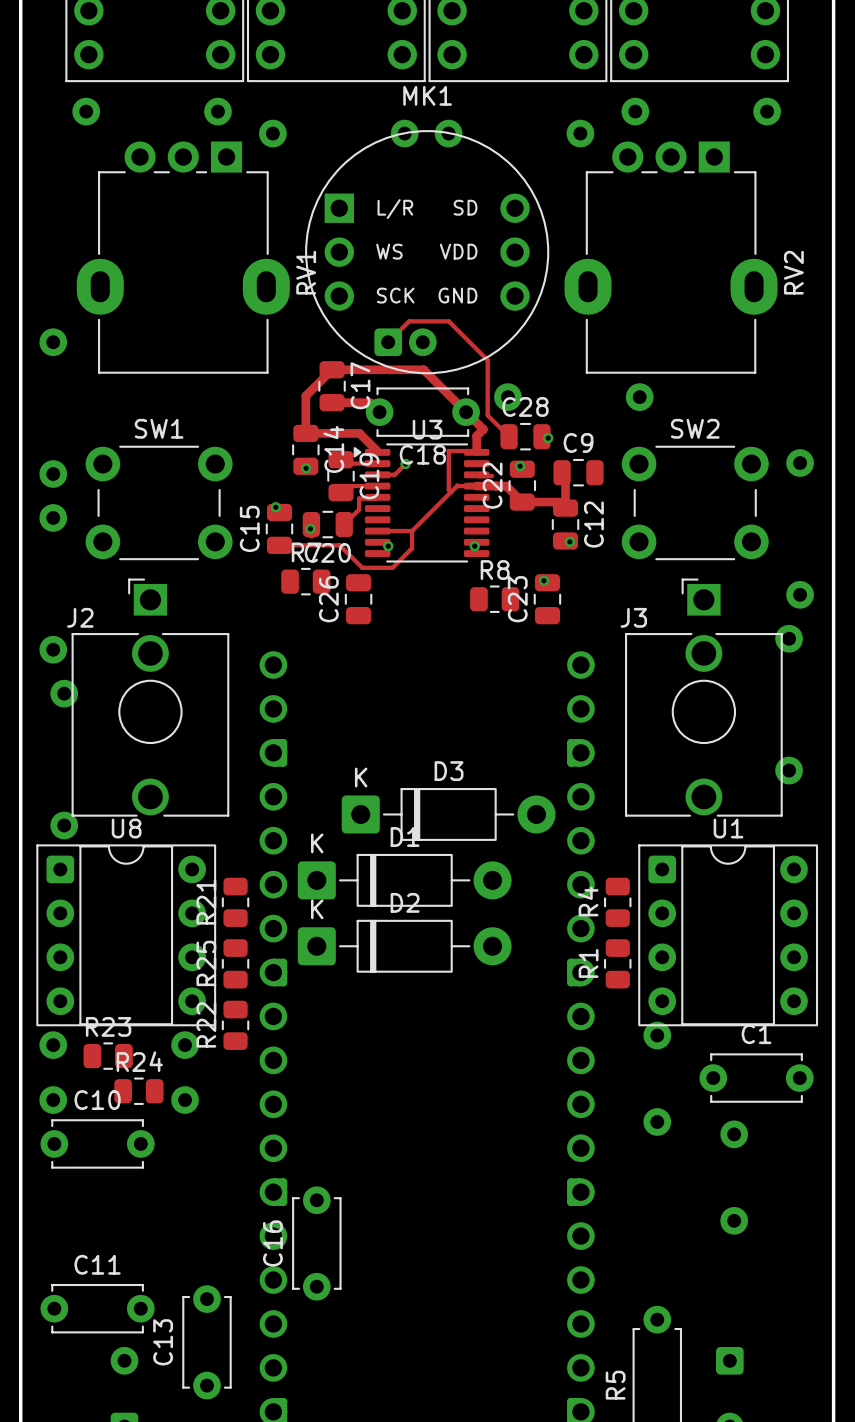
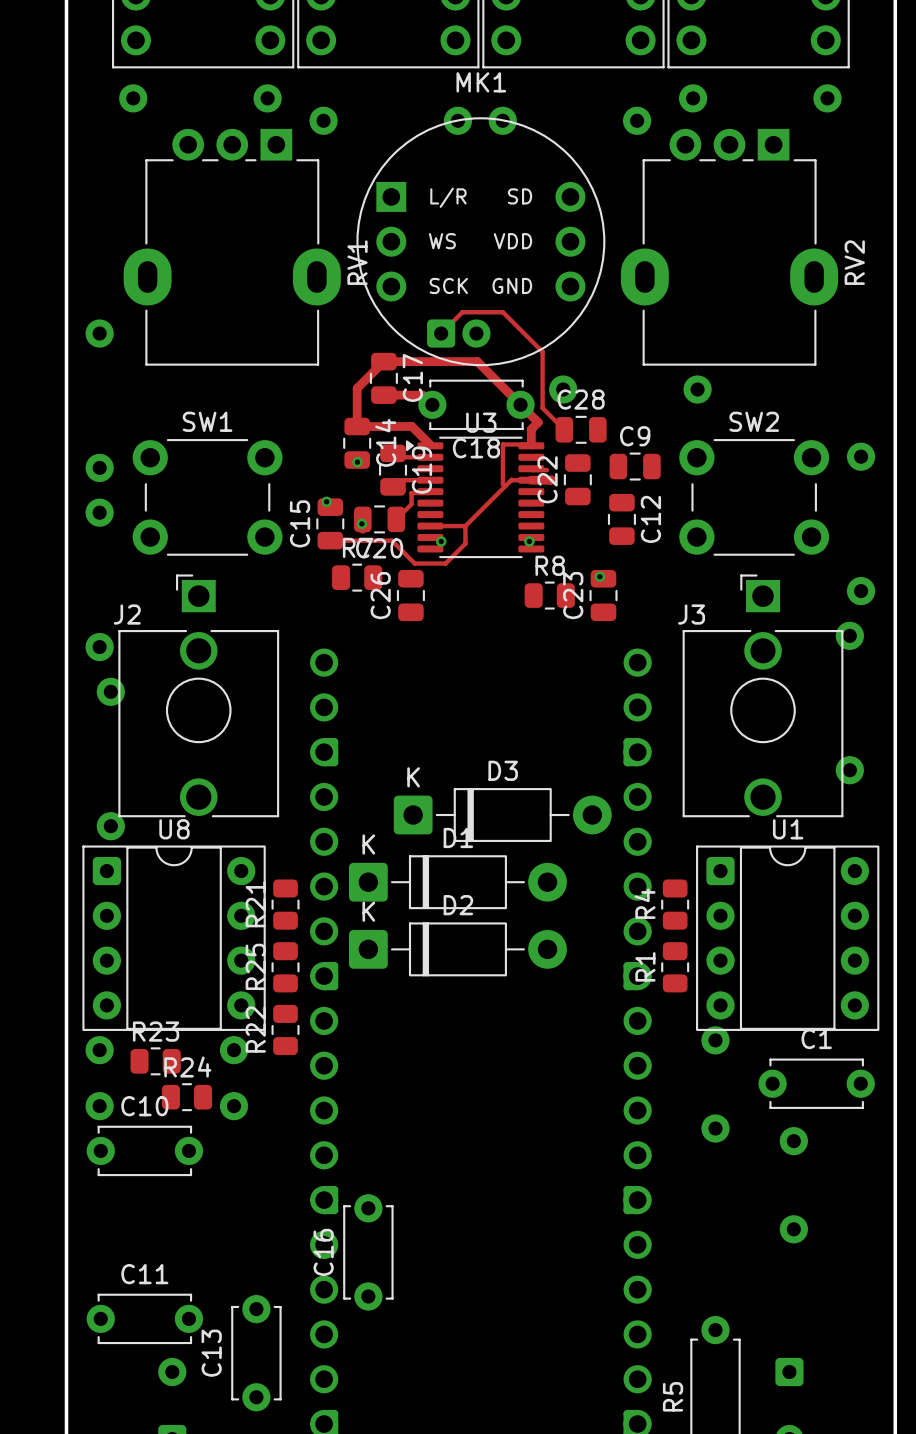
via: (548, 438) -> none
track: (405, 464) (394, 474) (377, 474) -> none
via: (405, 464) -> none
via: (520, 466) -> none
track: (562, 472) (565, 476) (565, 508) (559, 502) (522, 502) (506, 486) (495, 486) -> none
via: (569, 541) -> none

